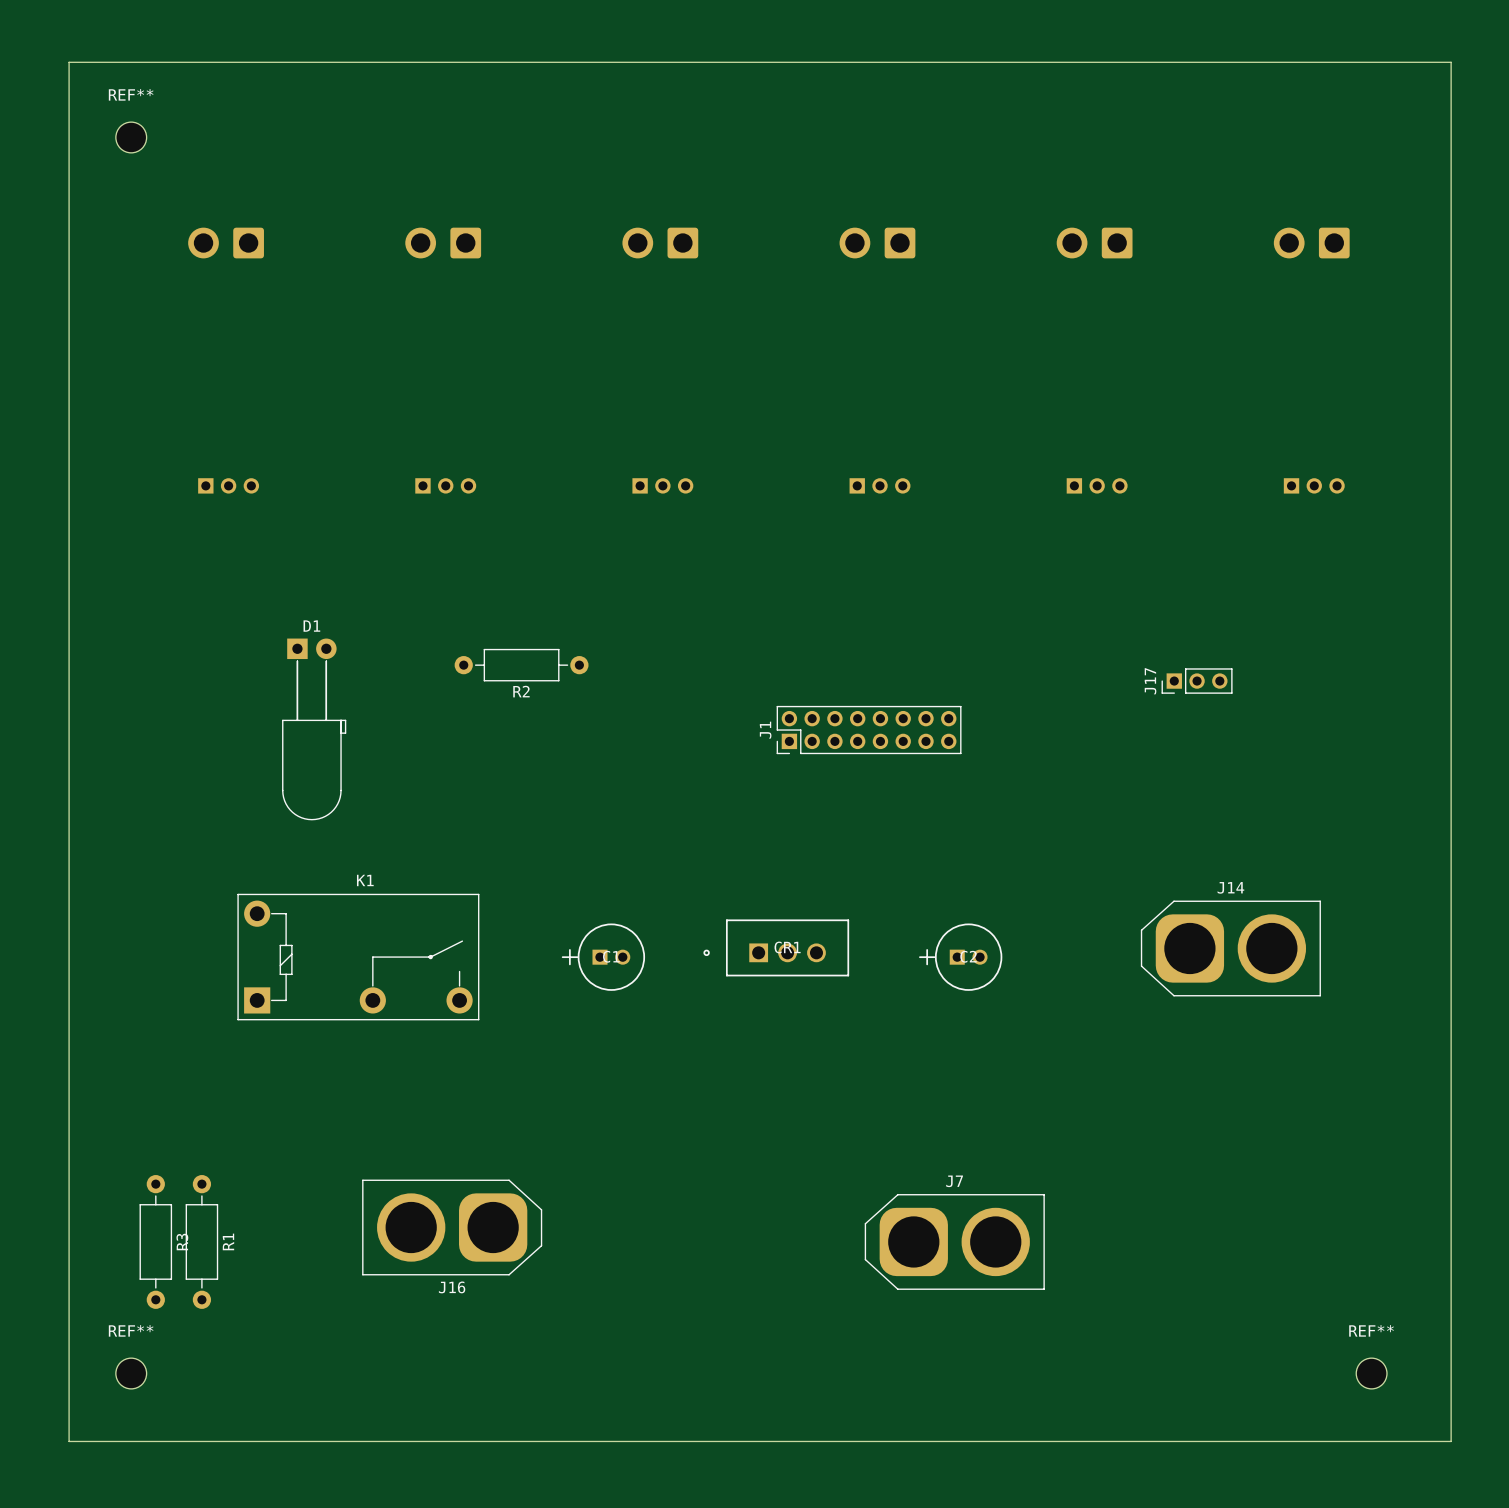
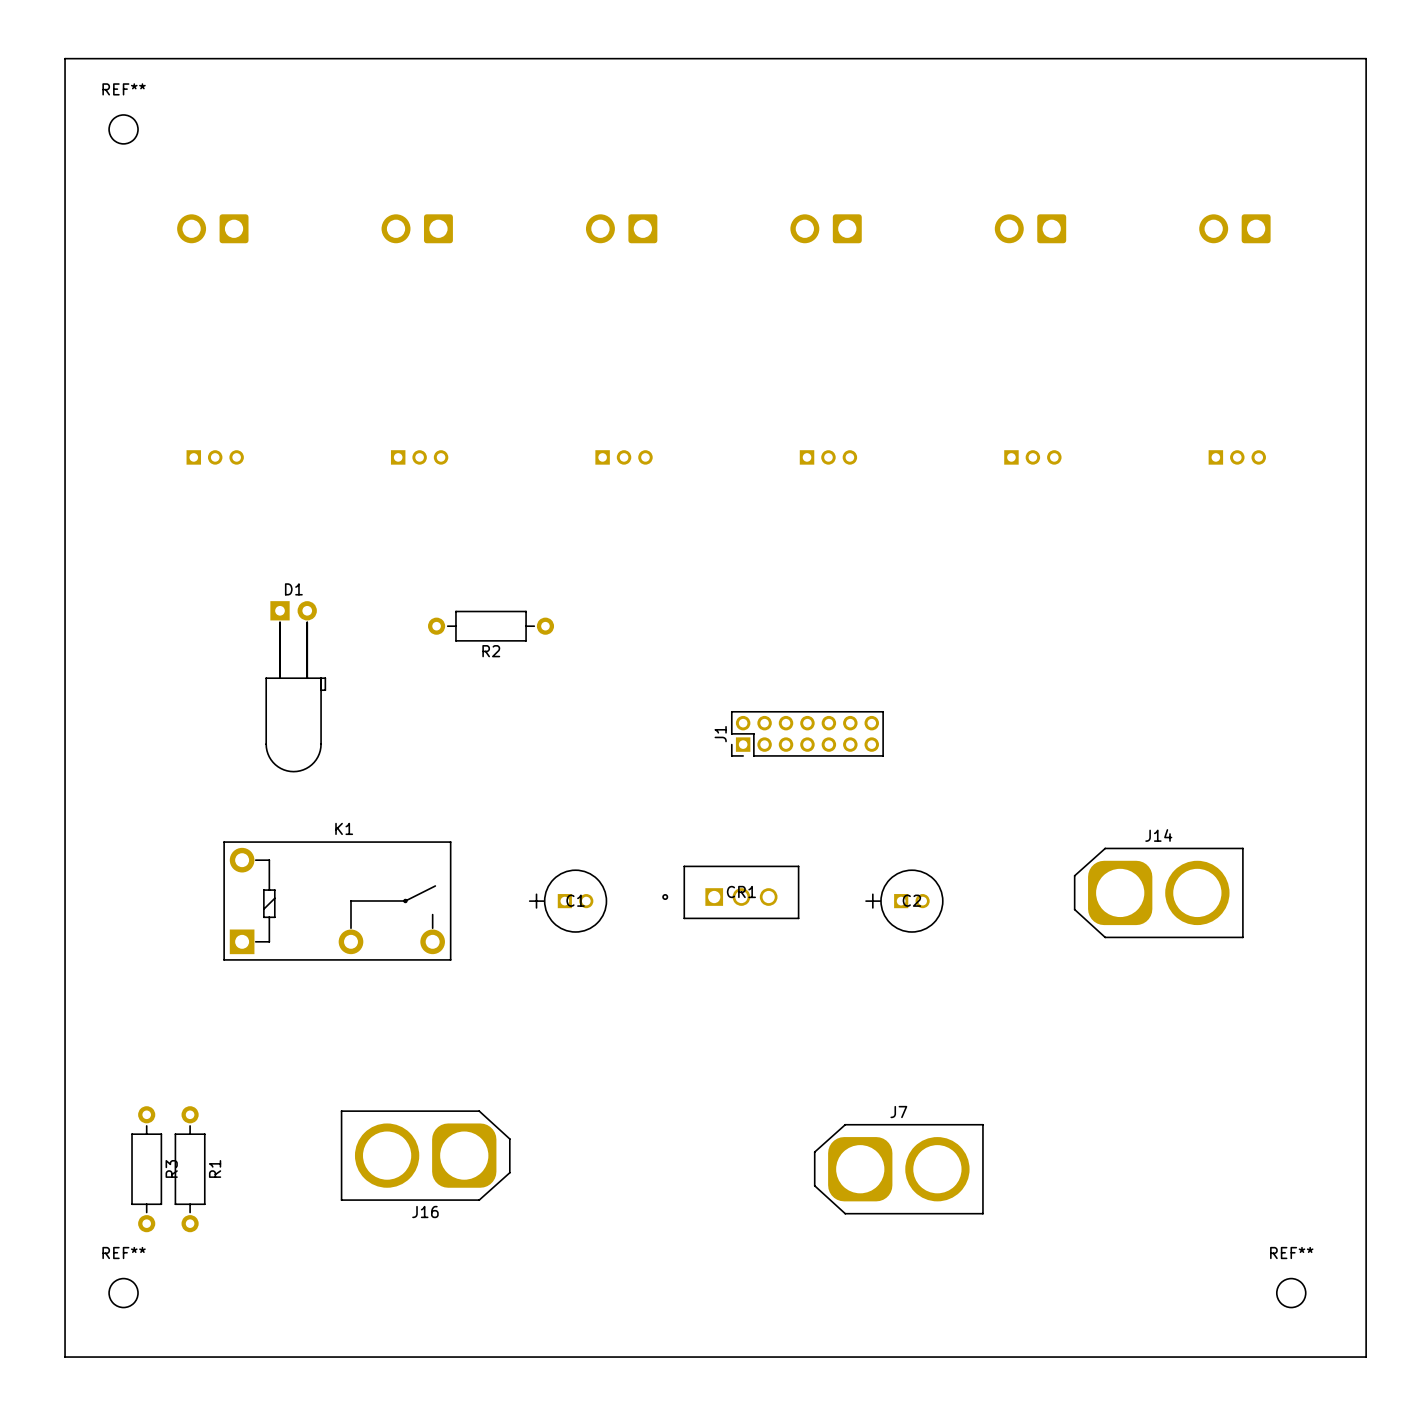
J17: (1197, 681) -> none
J1 footprint: [776, 705, 962, 755] -> [731, 711, 884, 757]

